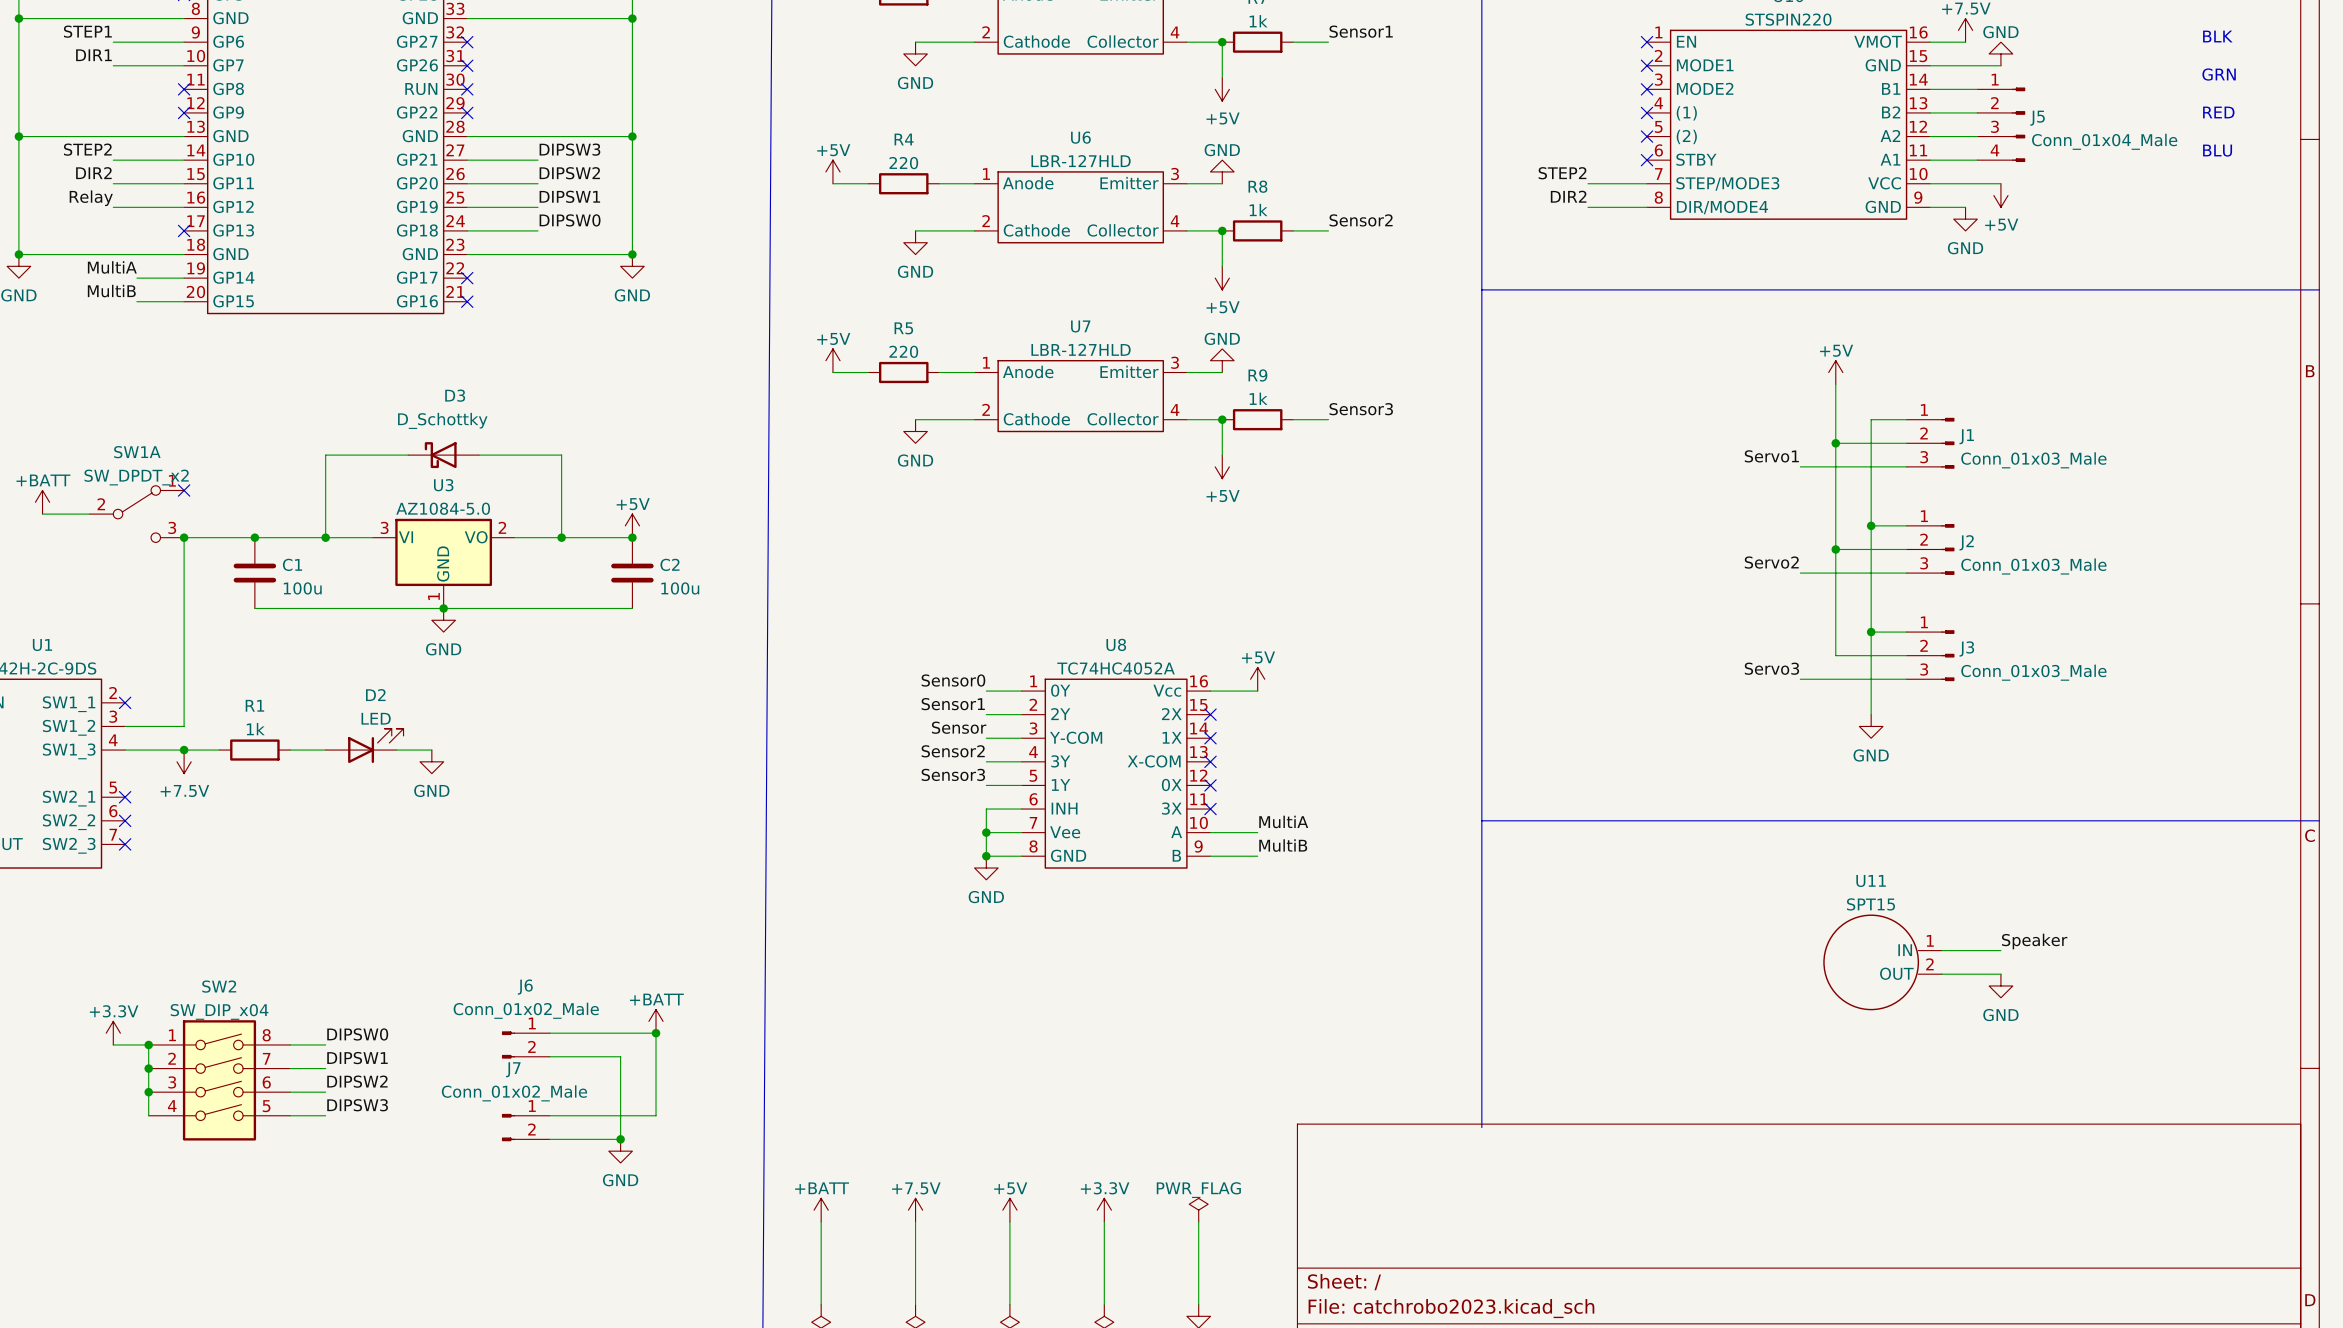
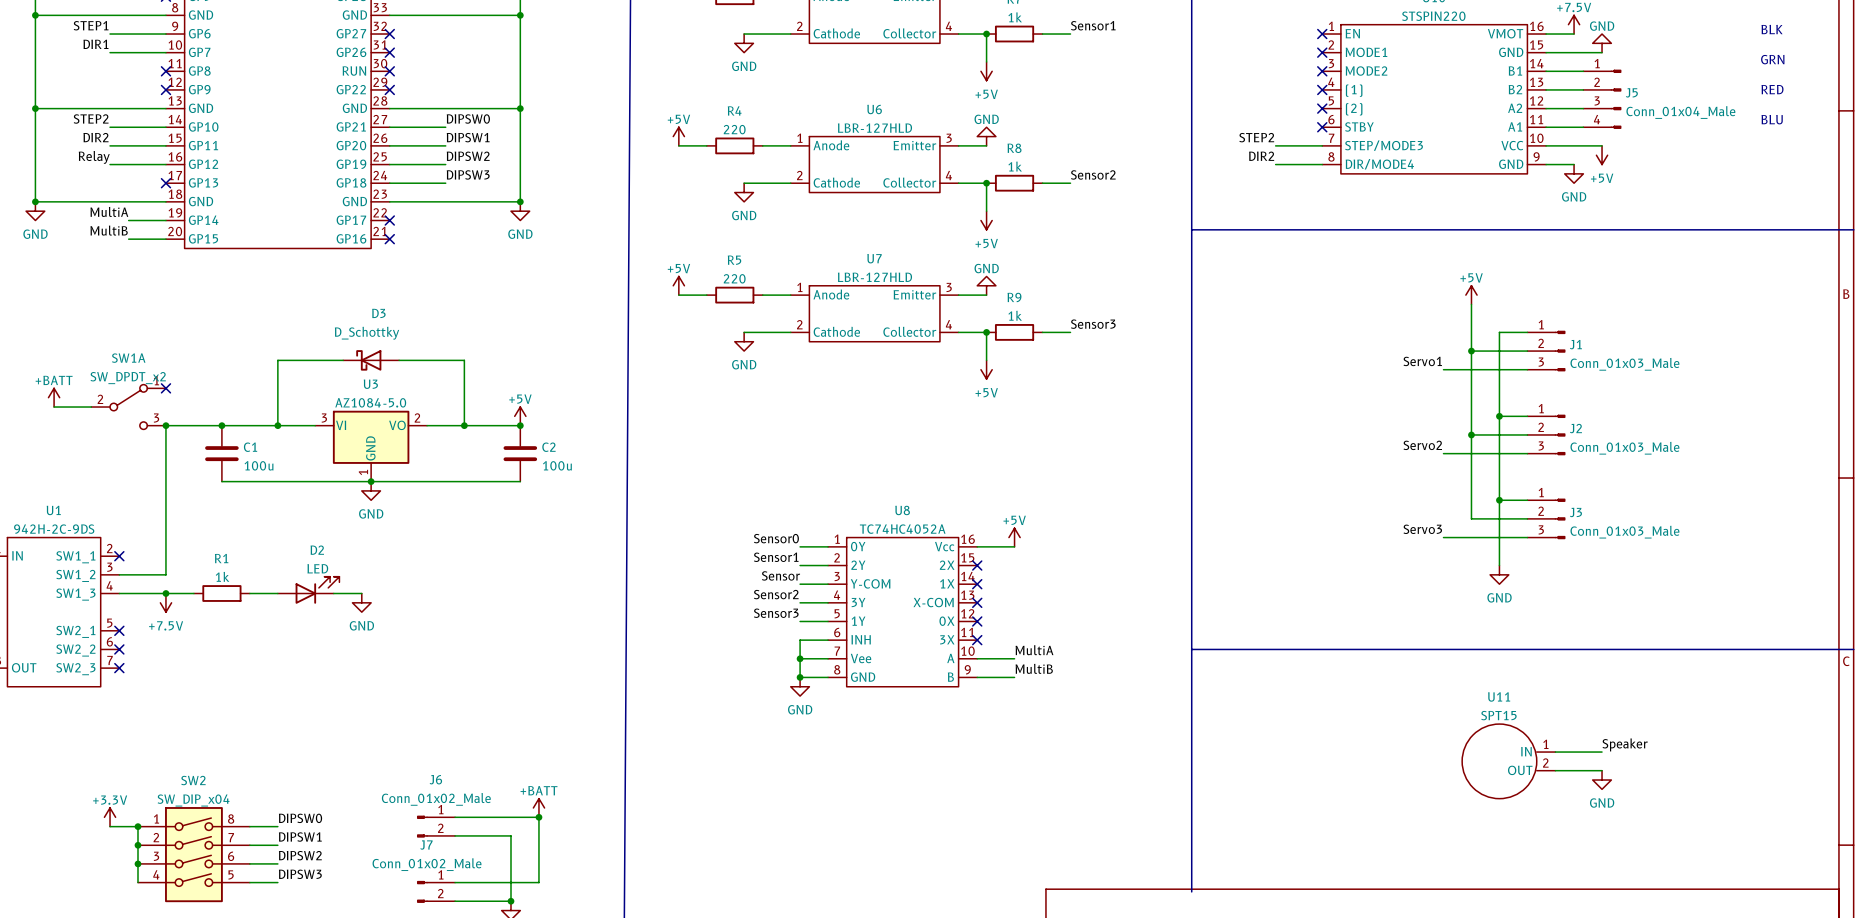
label: DIPSW3 (569, 149) -> DIPSW0 (468, 118)
label: DIPSW2 (569, 173) -> DIPSW1 (468, 137)
label: DIPSW1 (569, 196) -> DIPSW2 (468, 156)
label: DIPSW0 (570, 220) -> DIPSW3 (468, 174)

